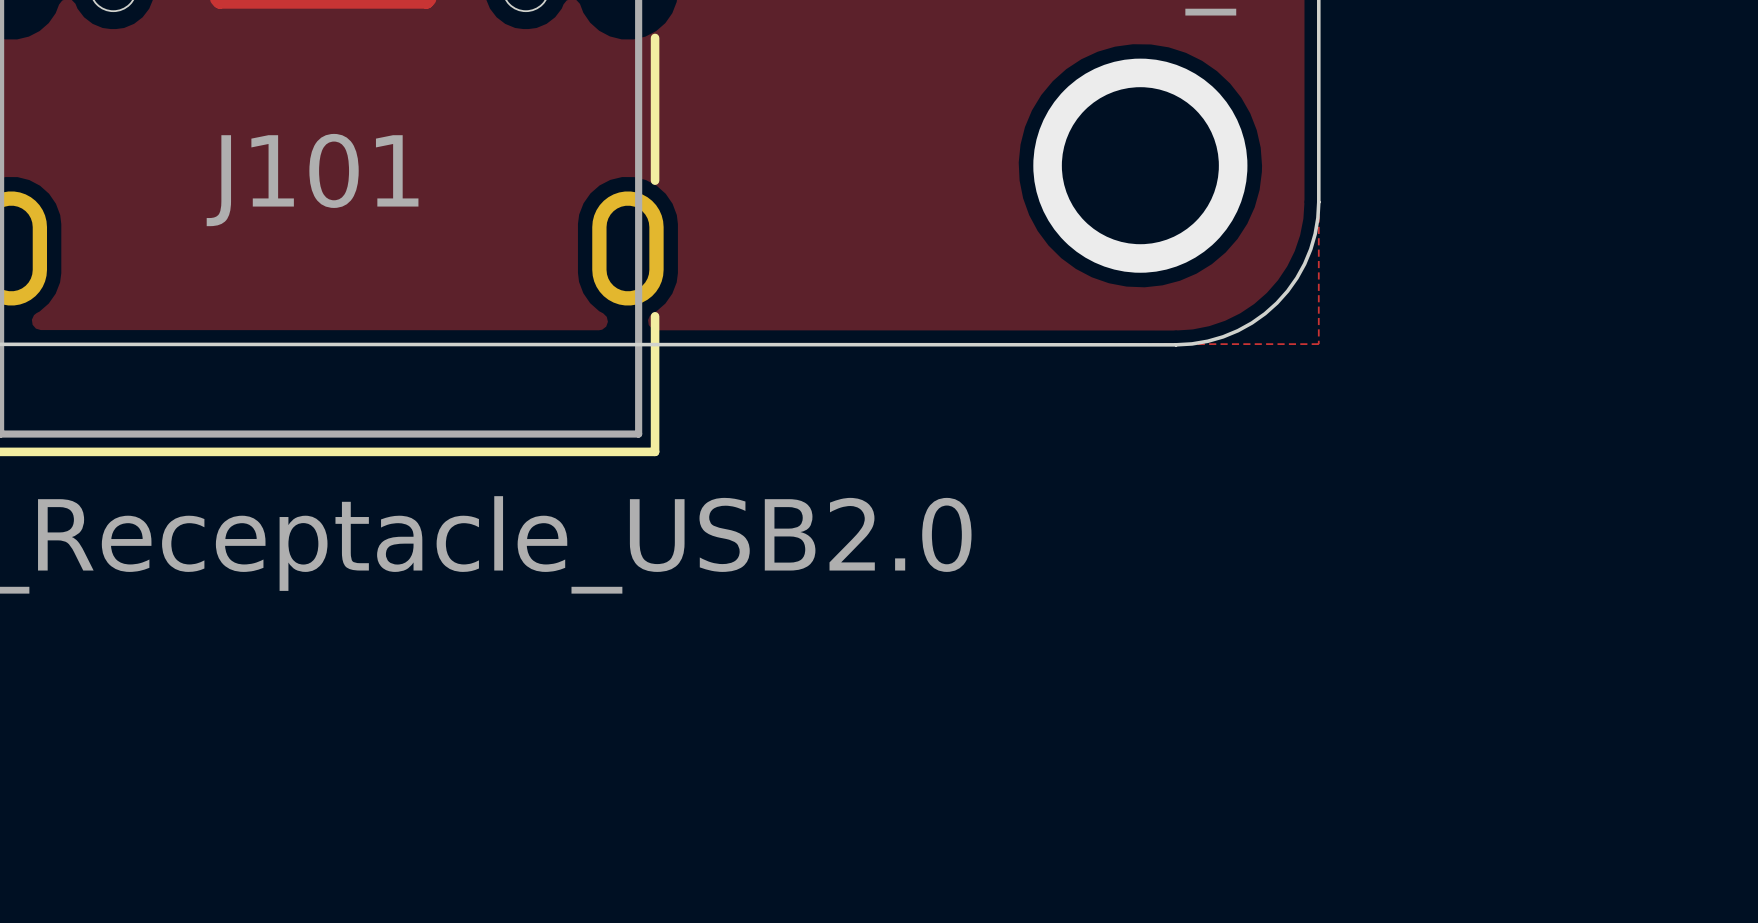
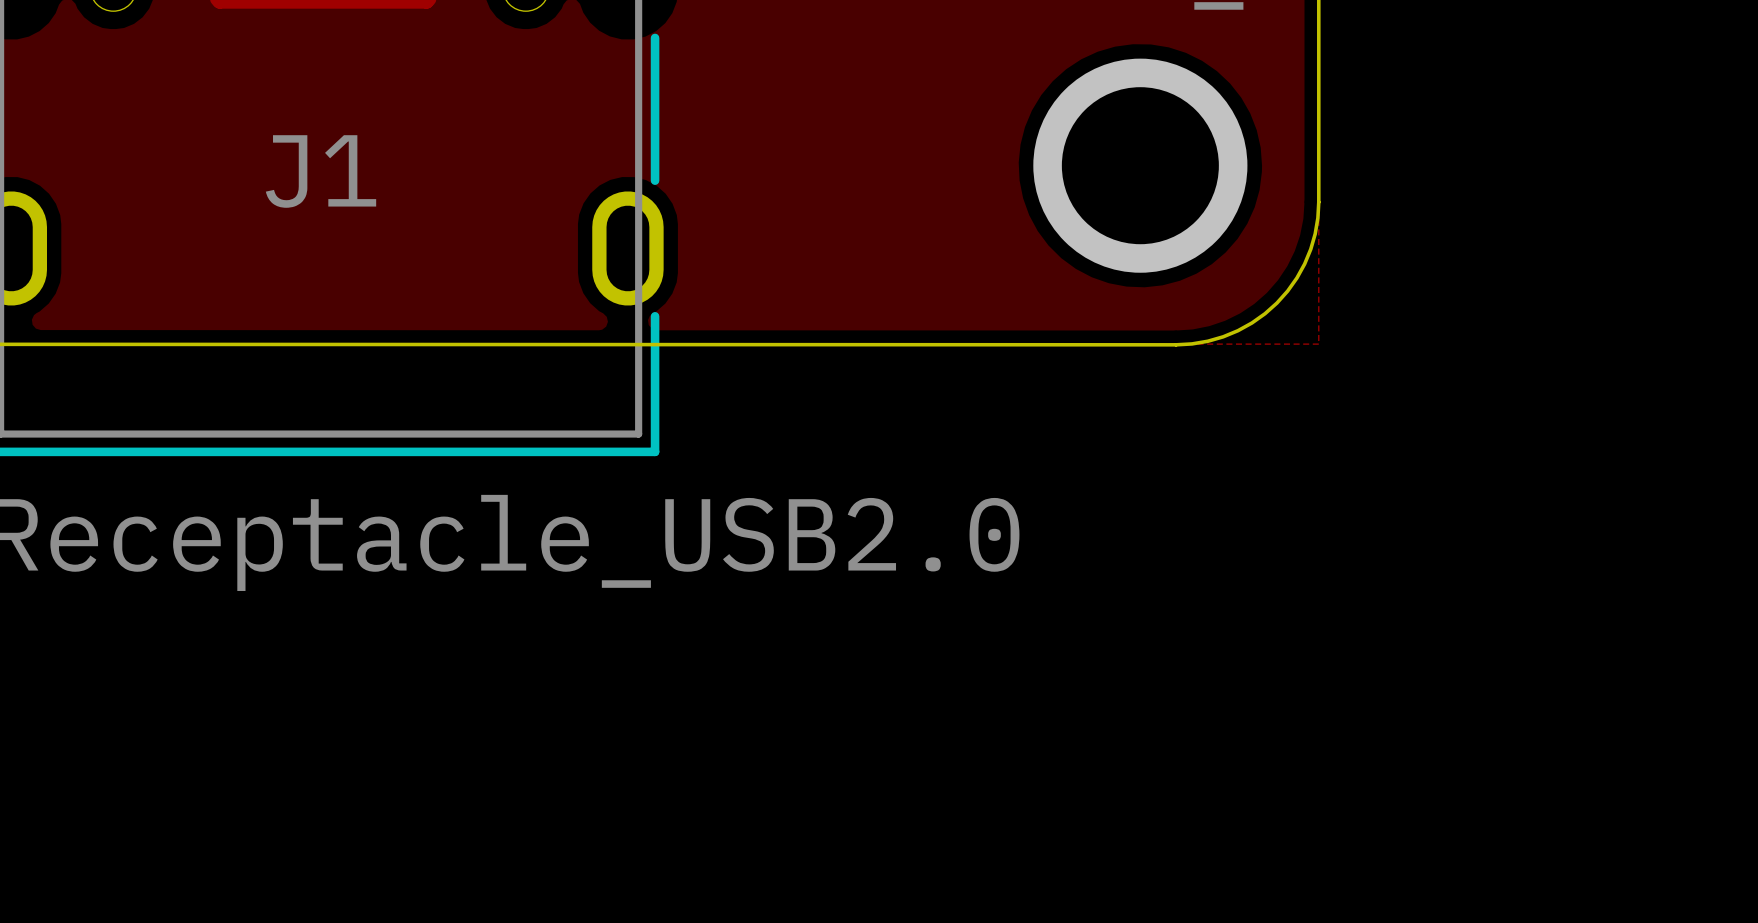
J101 name: J101 (312, 180) -> J1 (321, 171)

